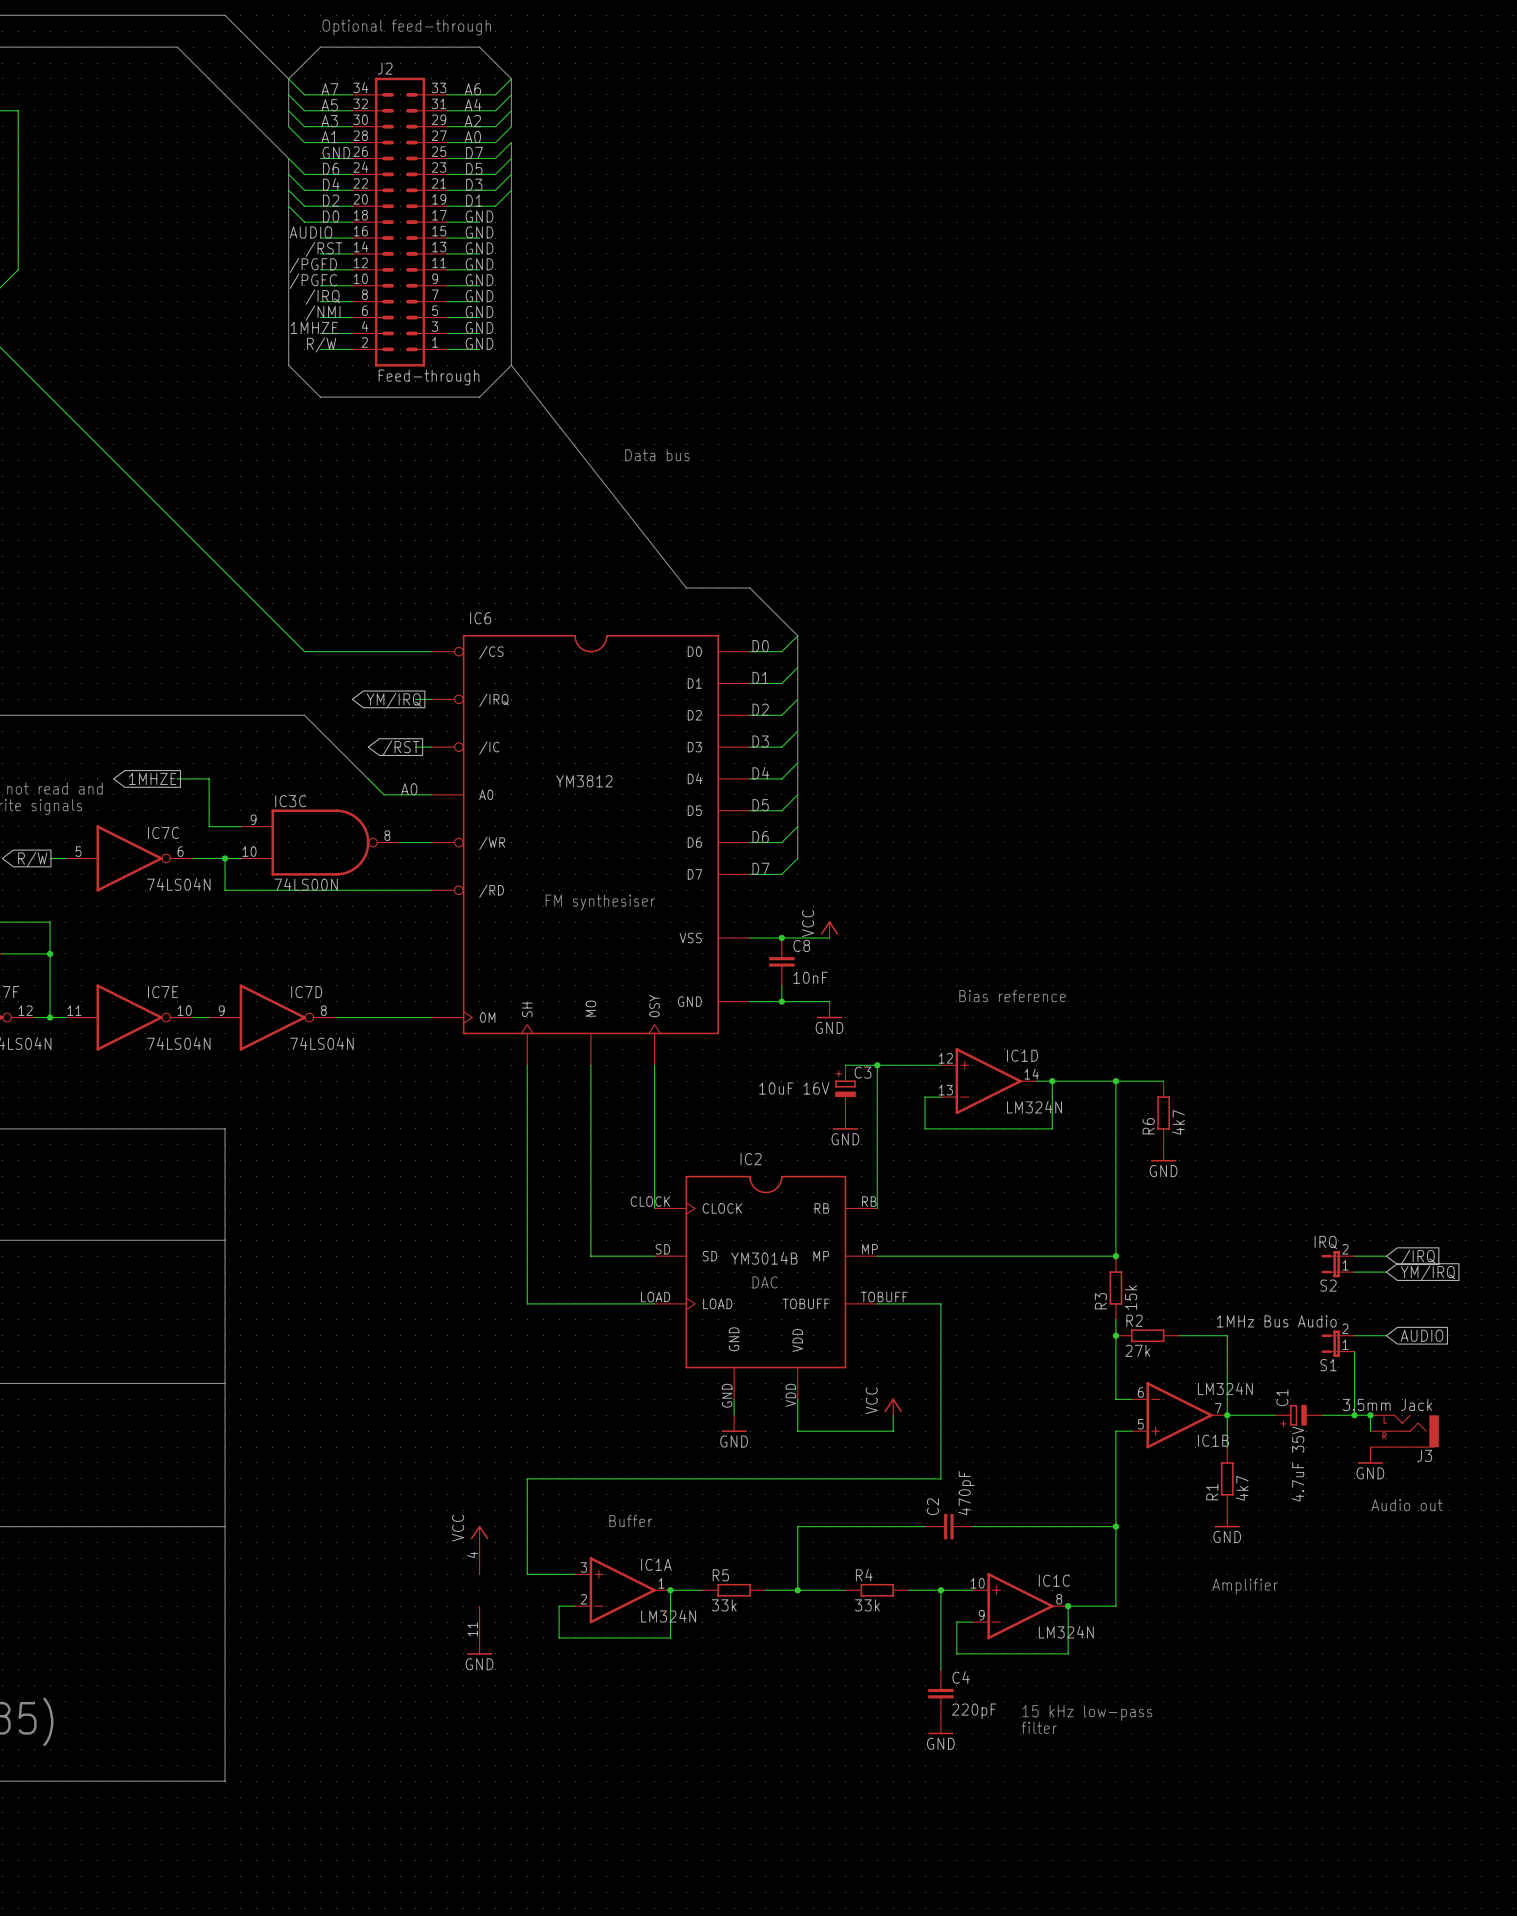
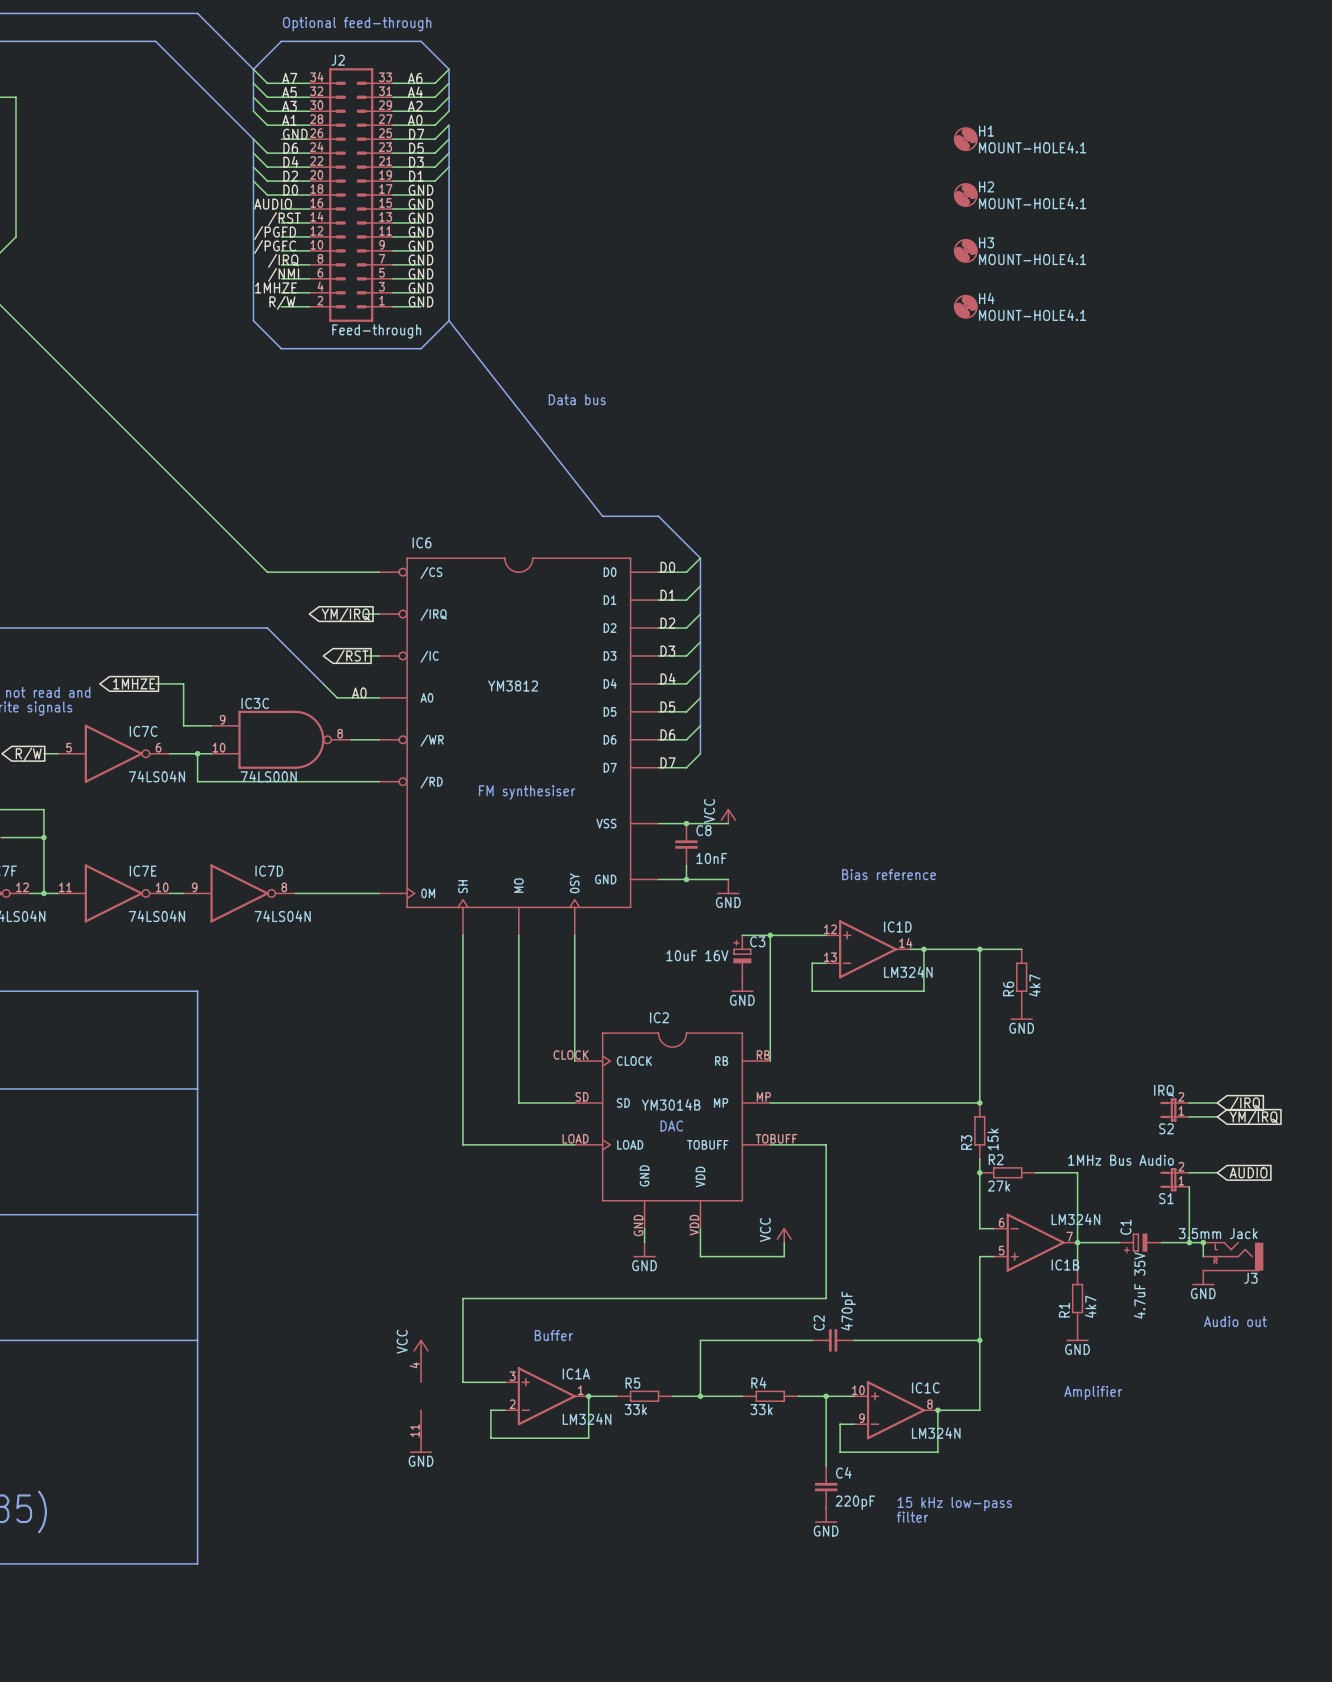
H1: none -> MOUNT-HOLE4.1 (965, 139)
H2: none -> MOUNT-HOLE4.1 (965, 195)
H3: none -> MOUNT-HOLE4.1 (965, 250)
H4: none -> MOUNT-HOLE4.1 (965, 306)

